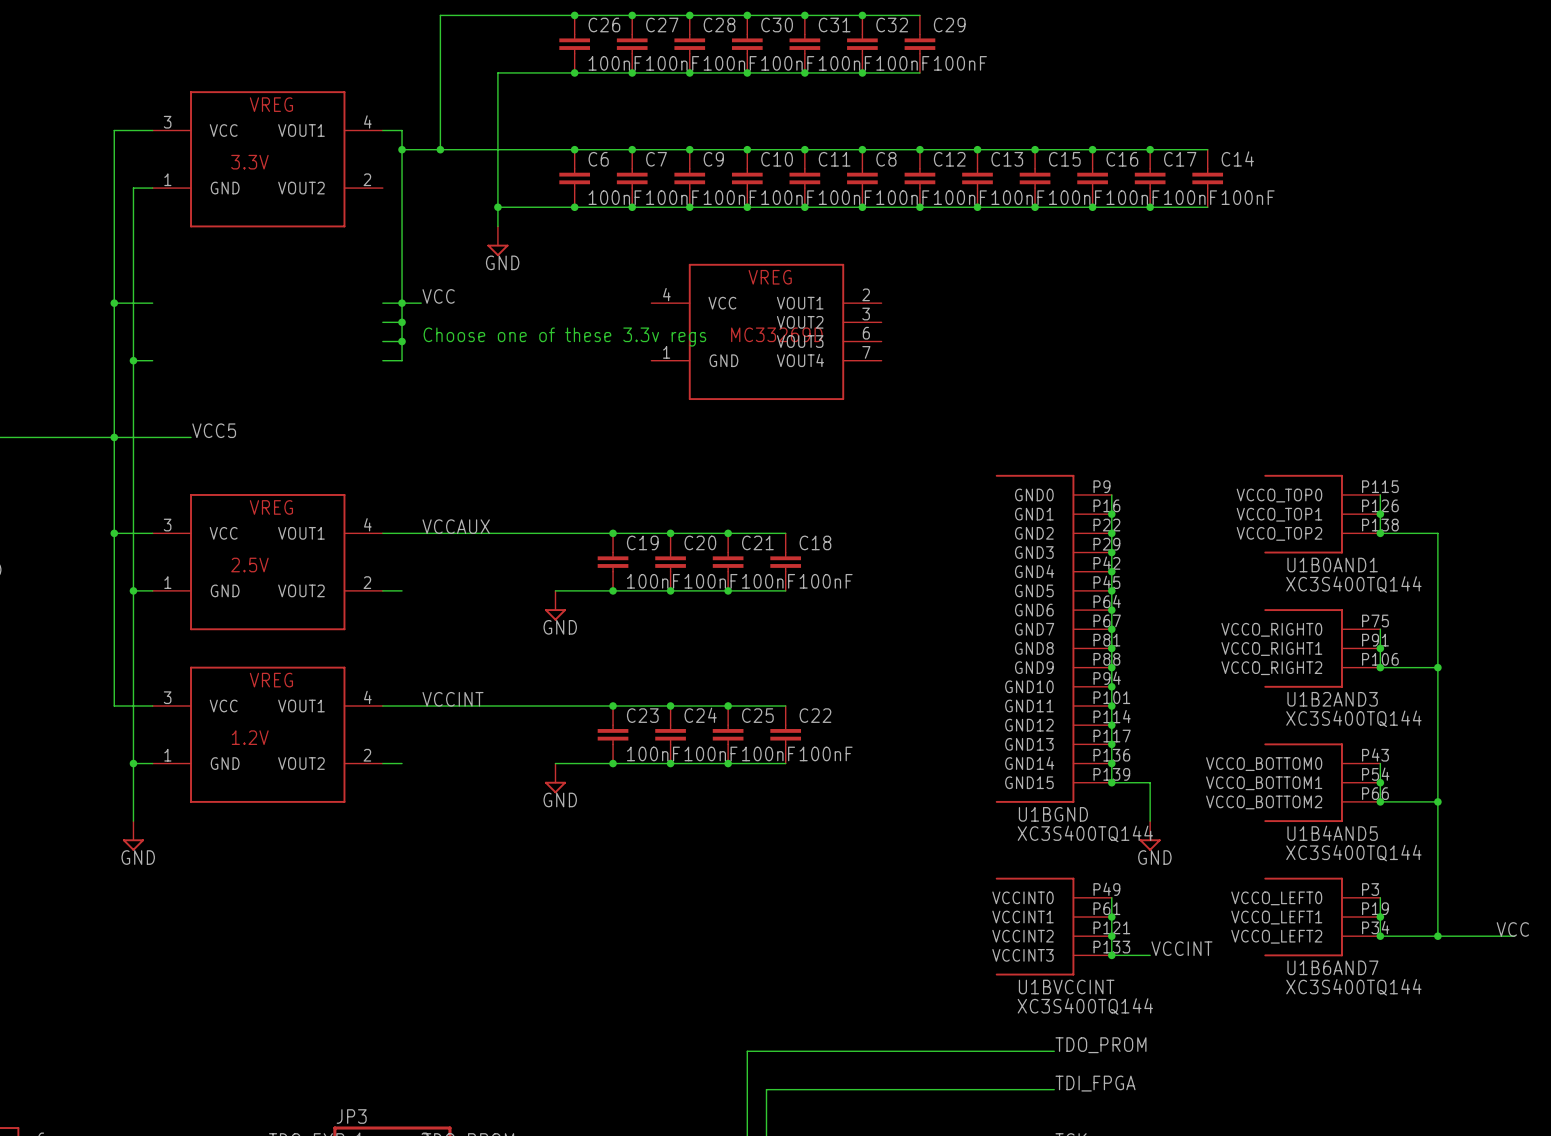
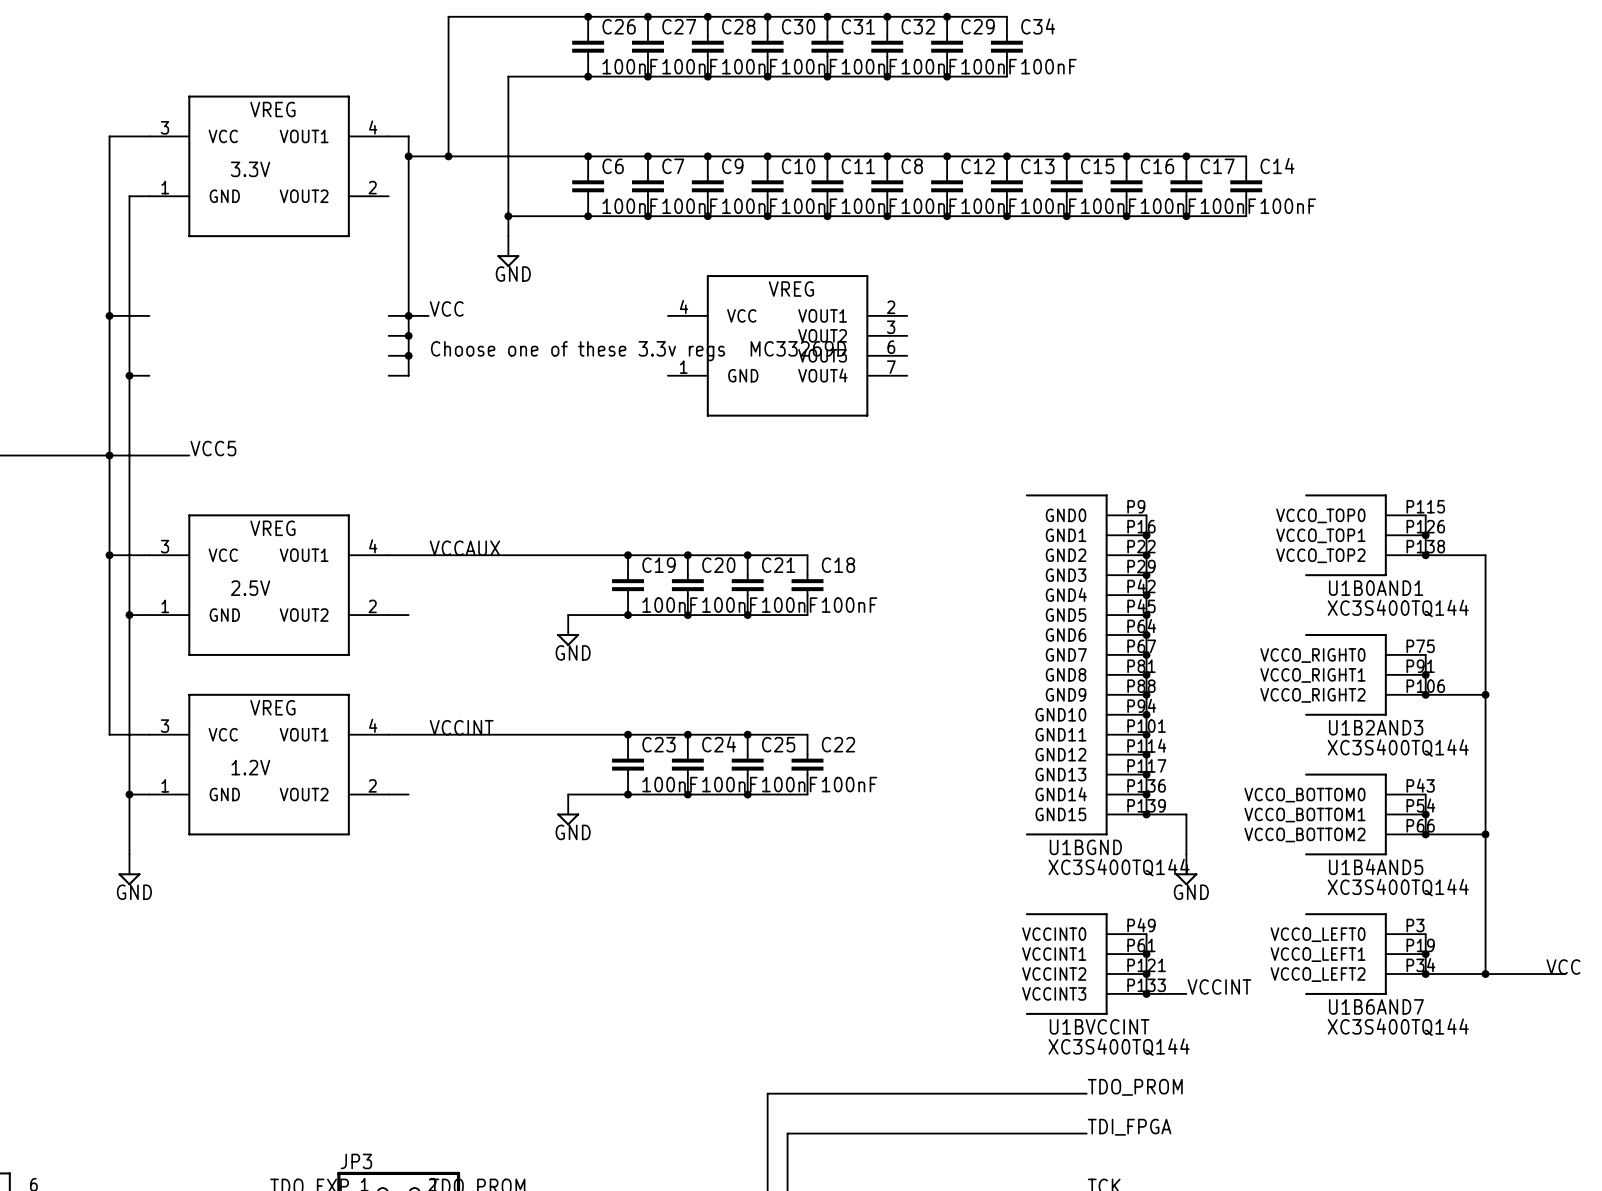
wire: none -> (947, 16) (1006, 16)
junction: none -> (947, 16)
C34: none -> 100nF (1006, 46)
wire: none -> (947, 76) (1006, 76)
junction: none -> (947, 76)

